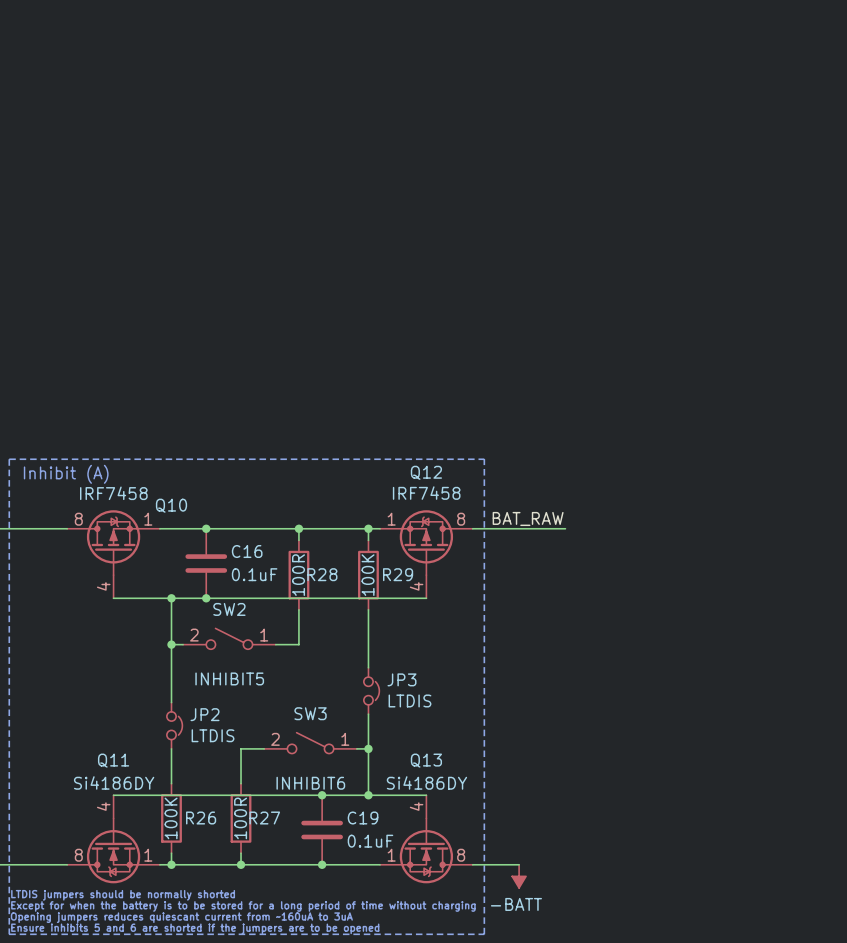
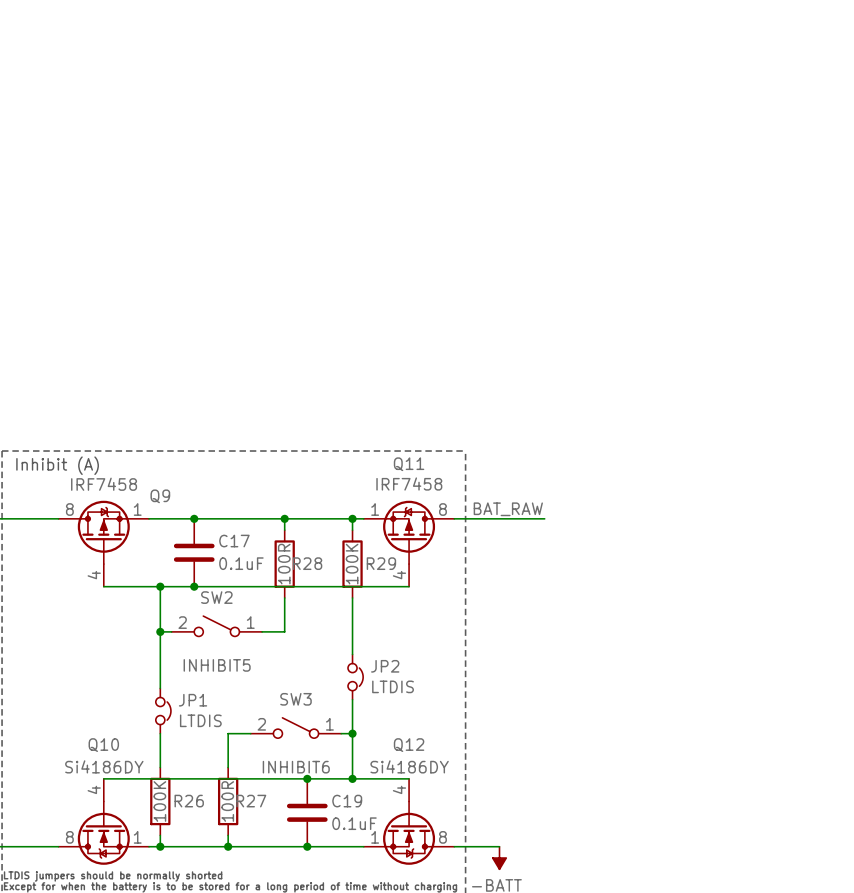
Q12 name: Q12 (426, 472) -> Q11 (409, 464)
Q10 name: Q10 (171, 505) -> Q9 (160, 496)
C16 name: C16 (247, 551) -> C17 (234, 541)
JP3 name: JP3 (401, 679) -> JP2 (385, 666)
JP2 name: JP2 (205, 714) -> JP1 (193, 700)
Q11 name: Q11 (113, 760) -> Q10 (103, 745)
Q13 name: Q13 (426, 760) -> Q12 (409, 745)

